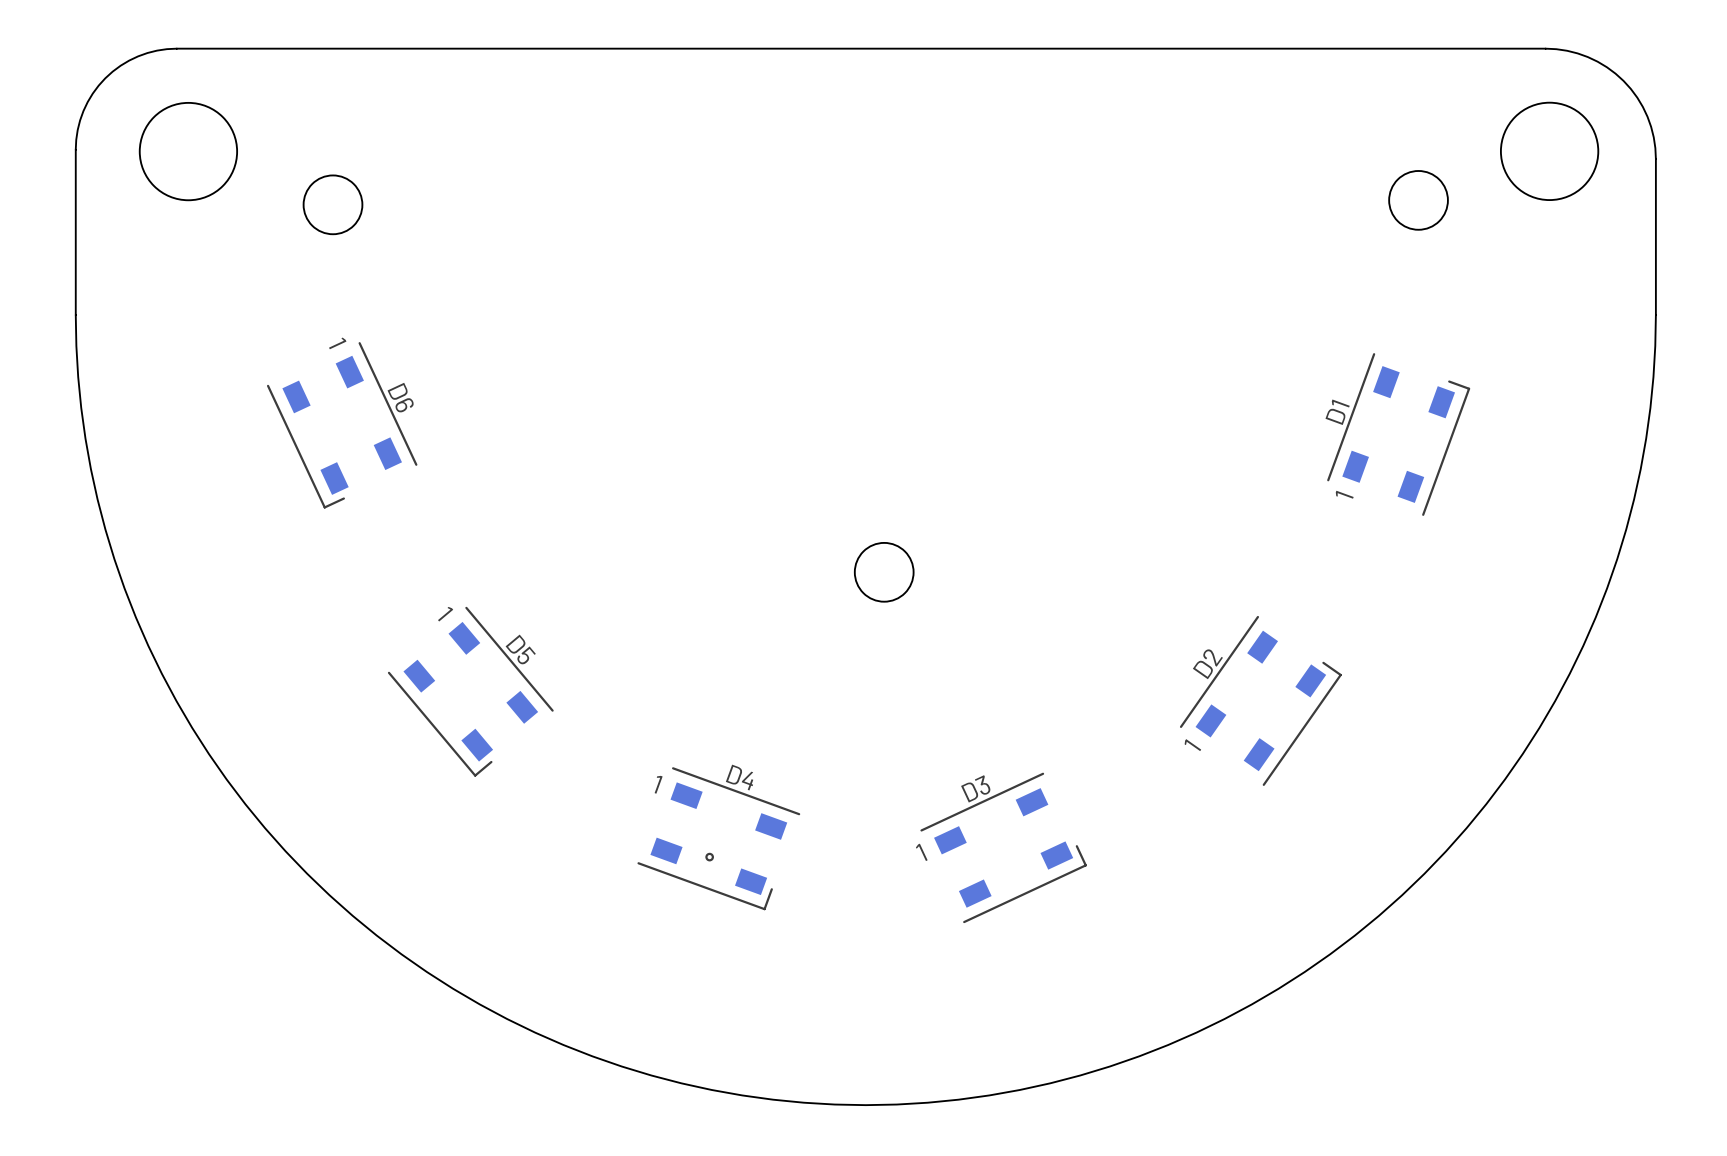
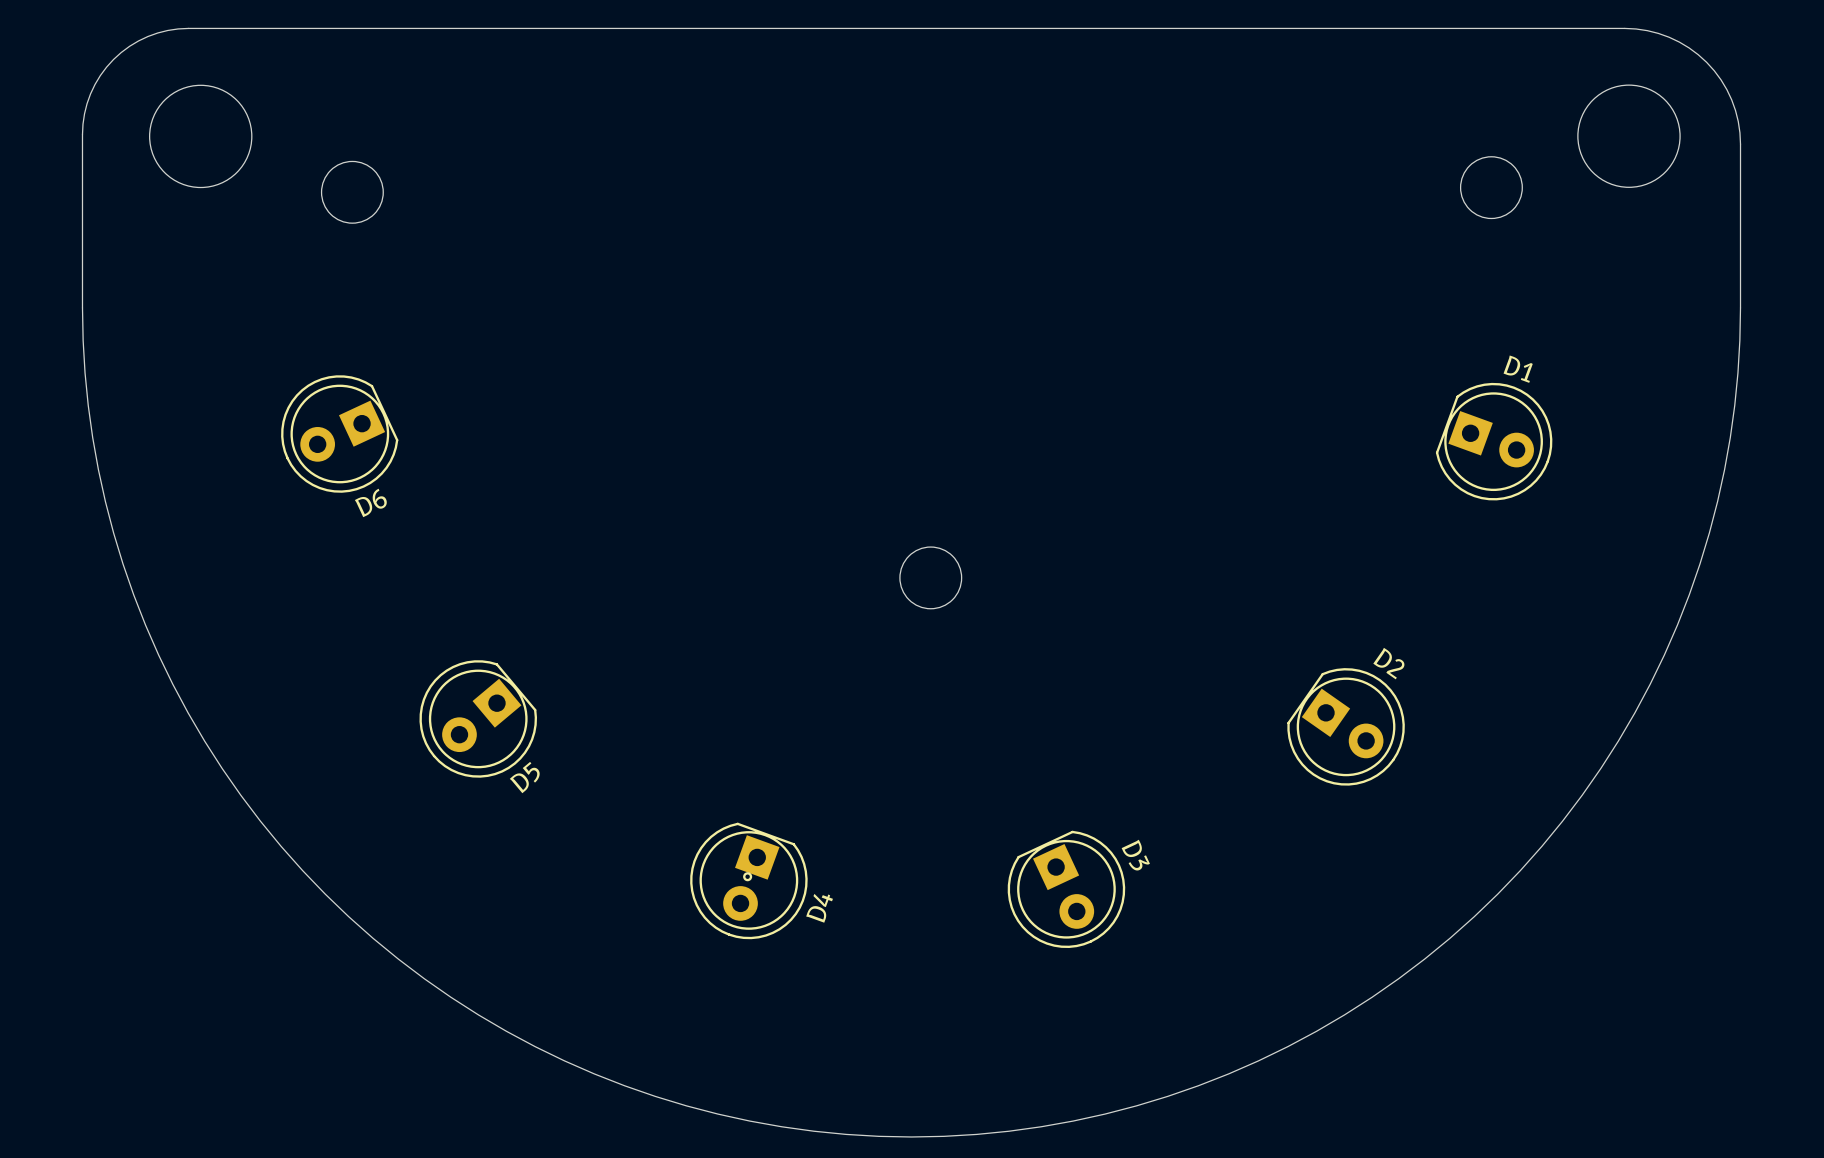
D6 footprint: [266, 342, 418, 509] -> [281, 375, 399, 493]
D1 footprint: [1327, 353, 1471, 516] -> [1435, 382, 1553, 501]
D6 name position: D6 (400, 397) -> D6 (370, 502)
D1 name position: D1 (1337, 412) -> D1 (1518, 369)
D5 footprint: [387, 606, 554, 777] -> [419, 660, 538, 778]
D2 footprint: [1179, 615, 1342, 786] -> [1287, 668, 1405, 786]
D5 name position: D5 (520, 649) -> D5 (524, 777)
D2 name position: D2 (1207, 664) -> D2 (1388, 663)
D4 footprint: [637, 767, 801, 911] -> [690, 822, 808, 940]
D3 footprint: [920, 772, 1087, 924] -> [1007, 830, 1126, 949]
D4 name position: D4 (739, 777) -> D4 (819, 908)
D3 name position: D3 (975, 788) -> D3 (1135, 855)

